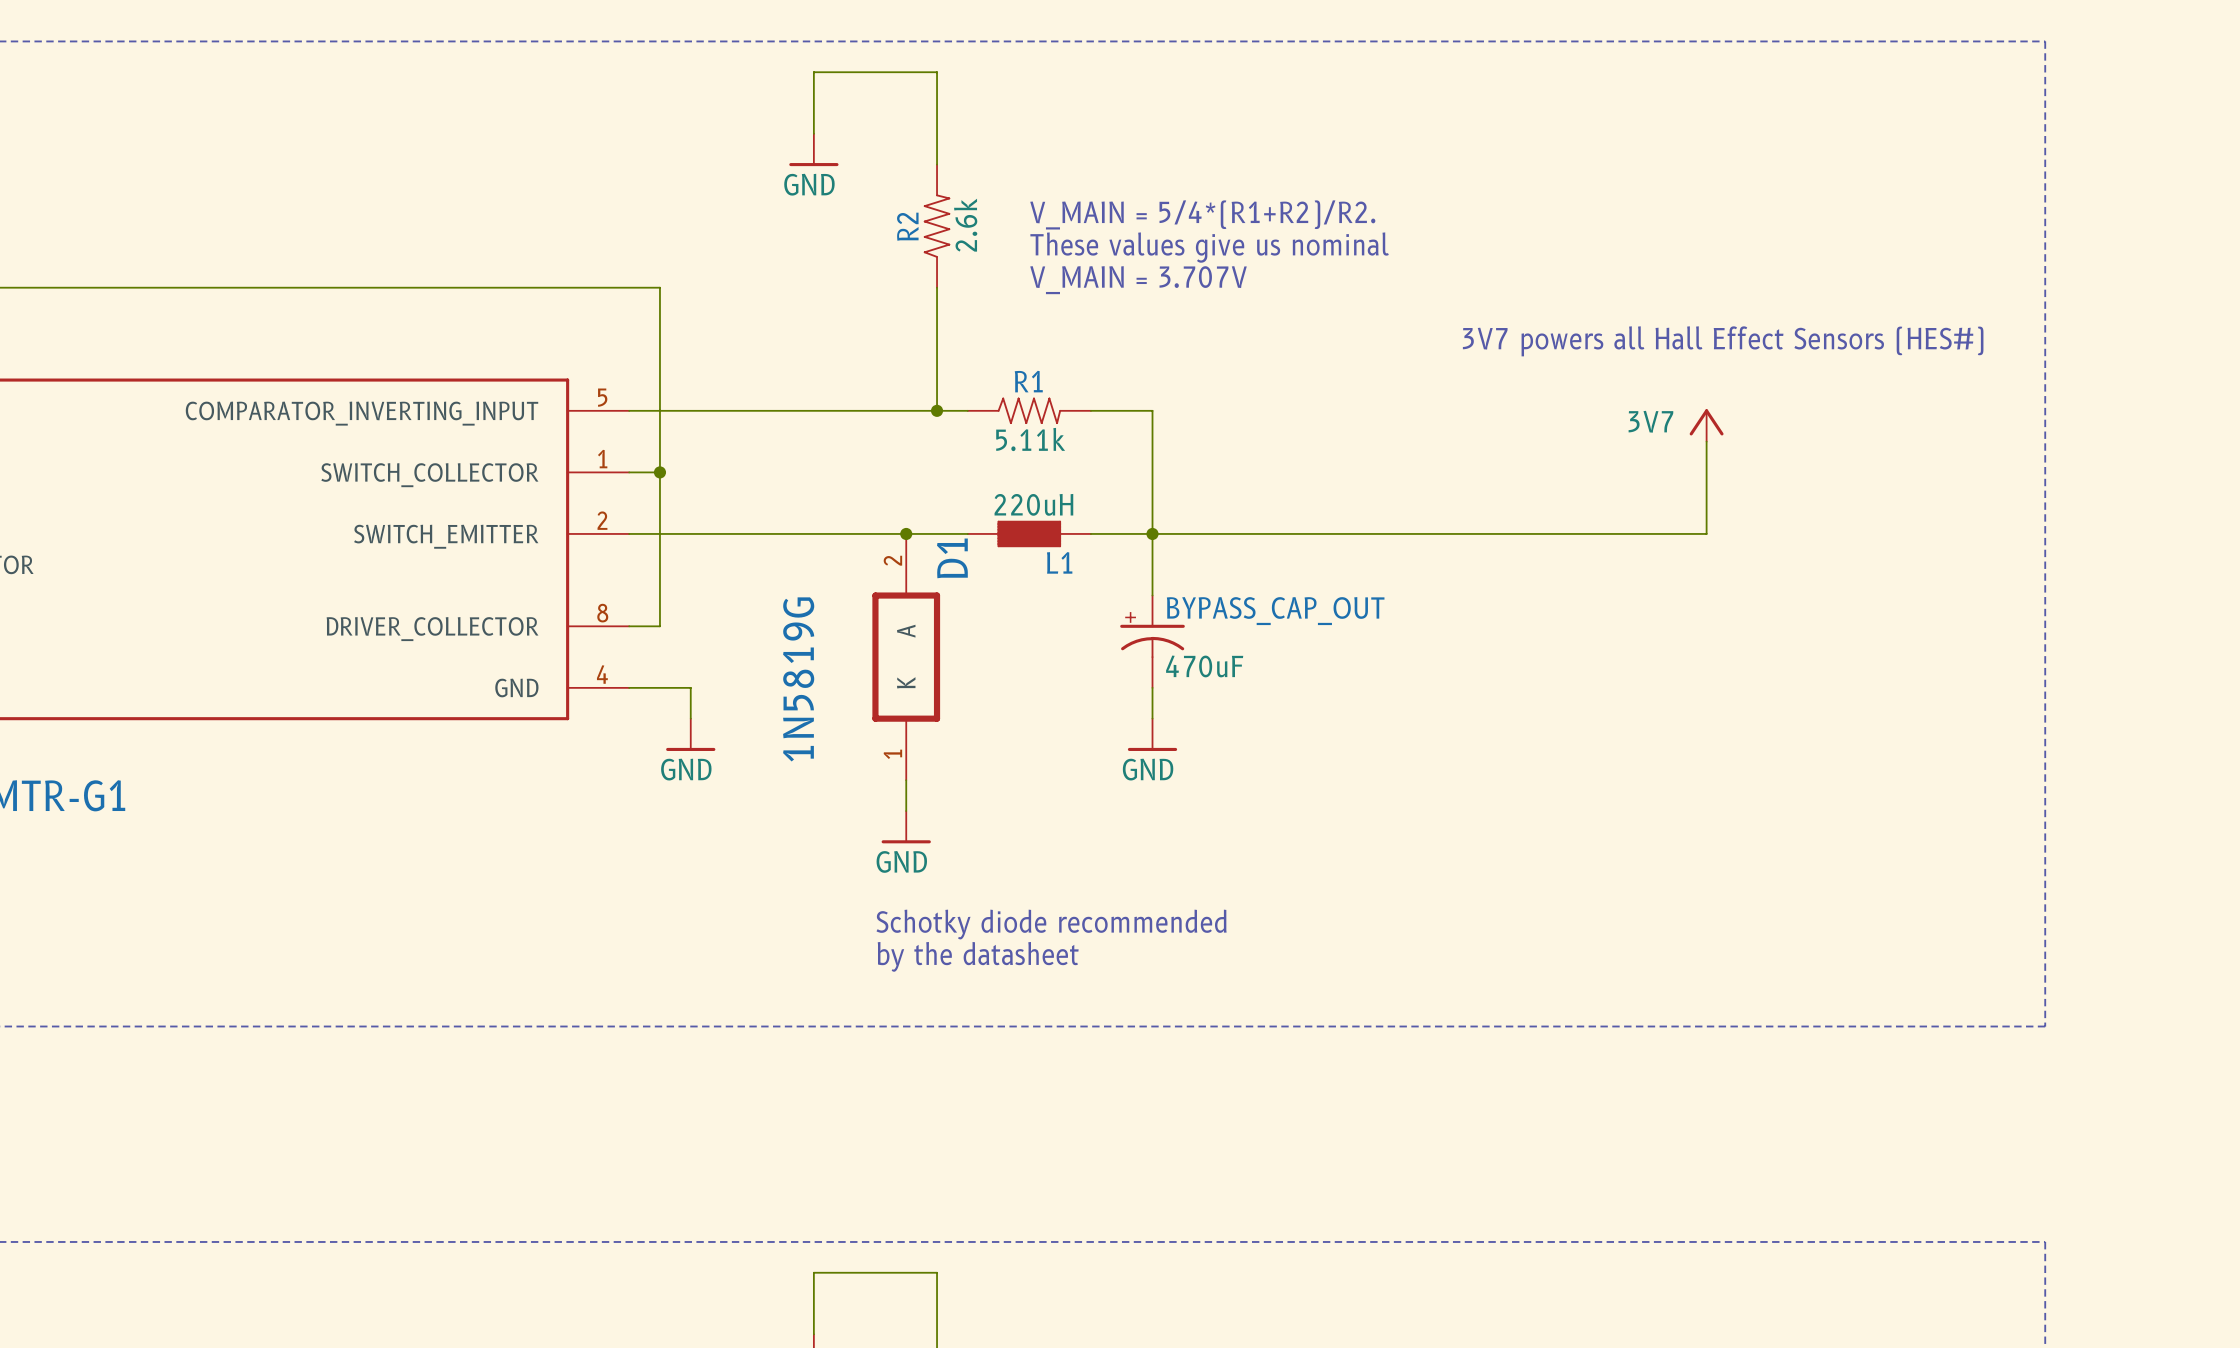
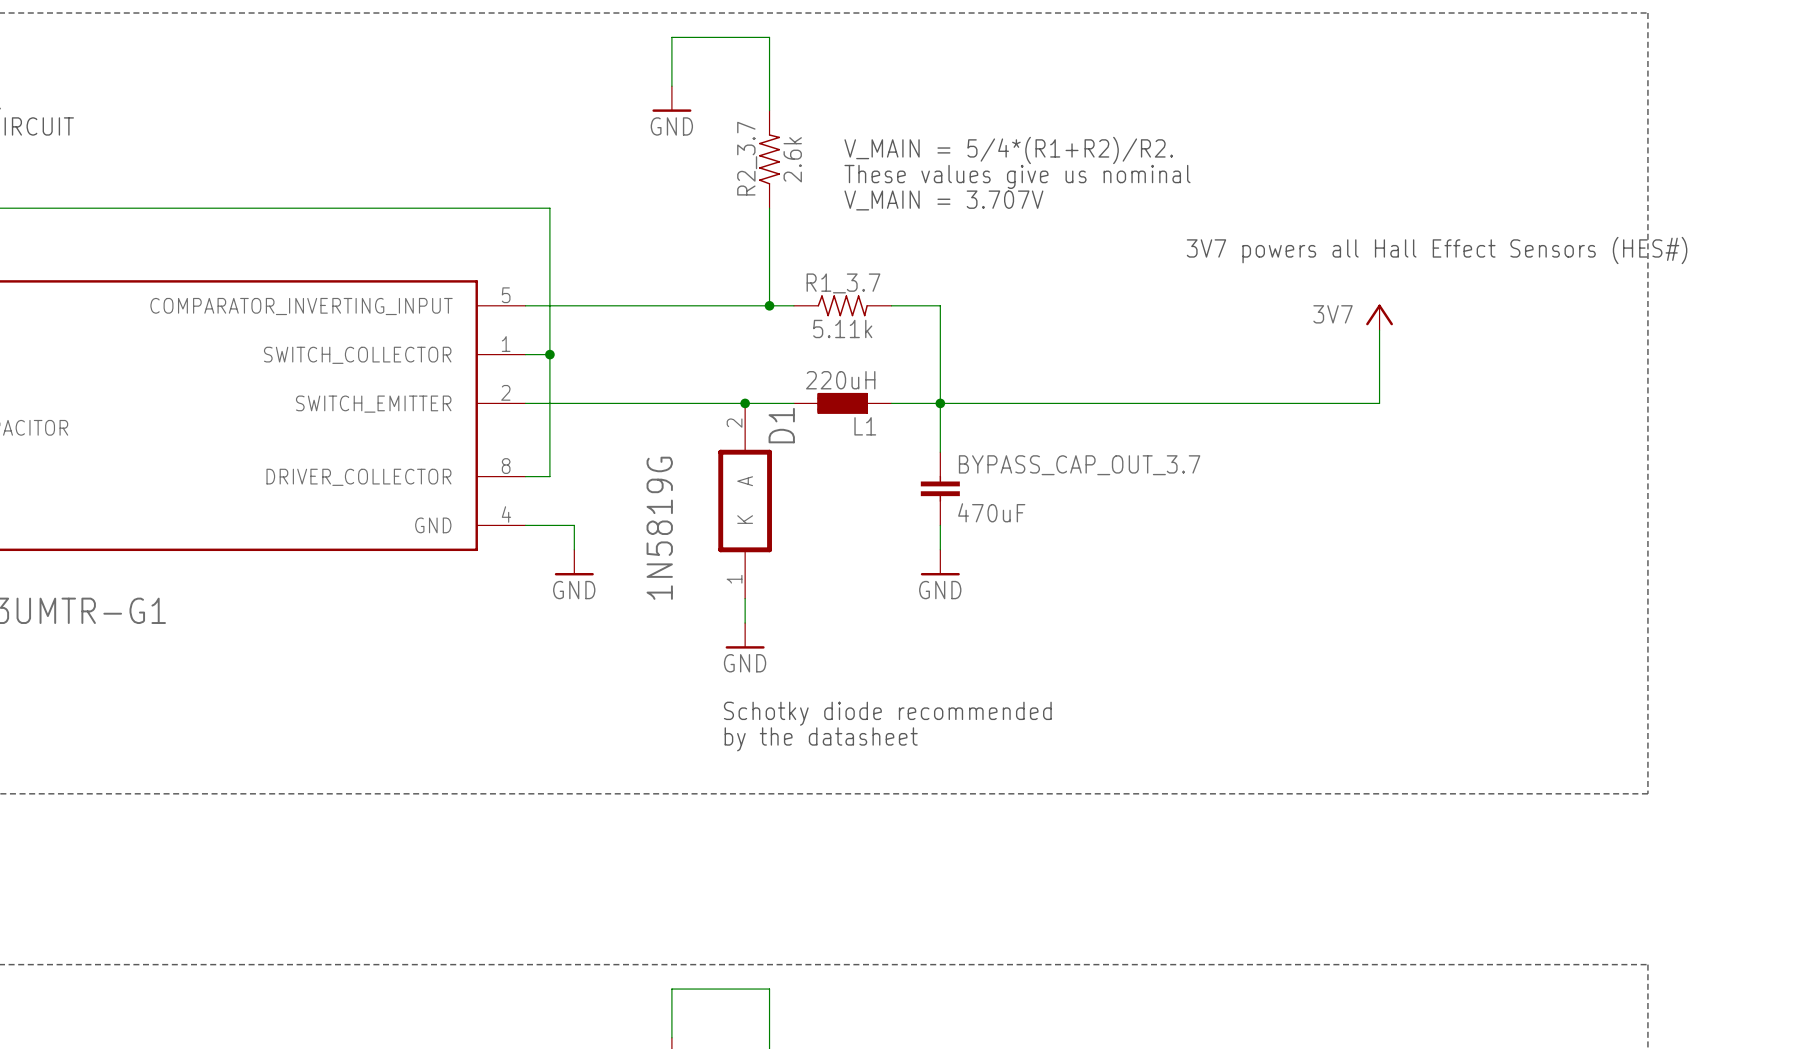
R2 name: R2 (907, 226) -> R2_3.7 (747, 158)
R1 name: R1 (1028, 381) -> R1_3.7 (843, 283)
BYPASS_CAP_OUT: 470uF (1152, 641) -> none
BYPASS_CAP_OUT_3.7: none -> 470uF (940, 488)

